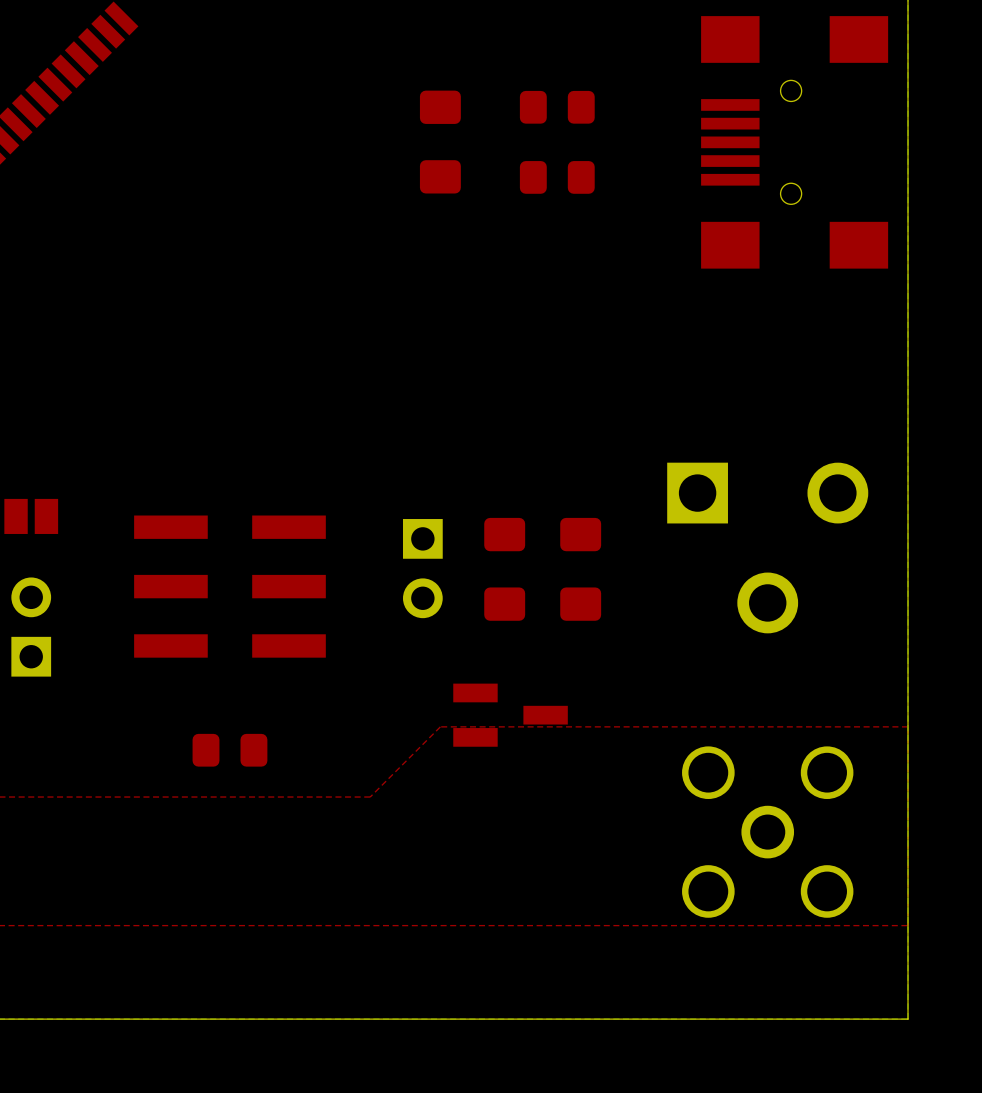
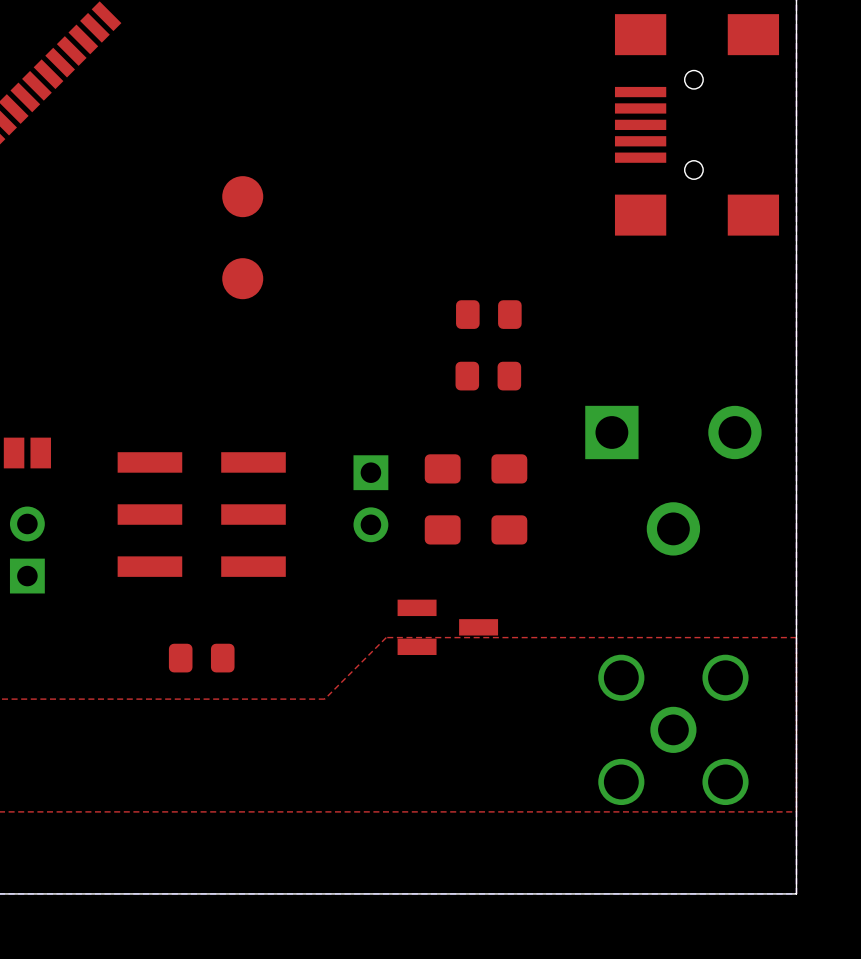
part: (557, 107) -> none
part: (440, 142) -> none
part: (557, 177) -> none
part: none -> (242, 196)
part: none -> (242, 278)
part: none -> (488, 314)
part: none -> (488, 376)

